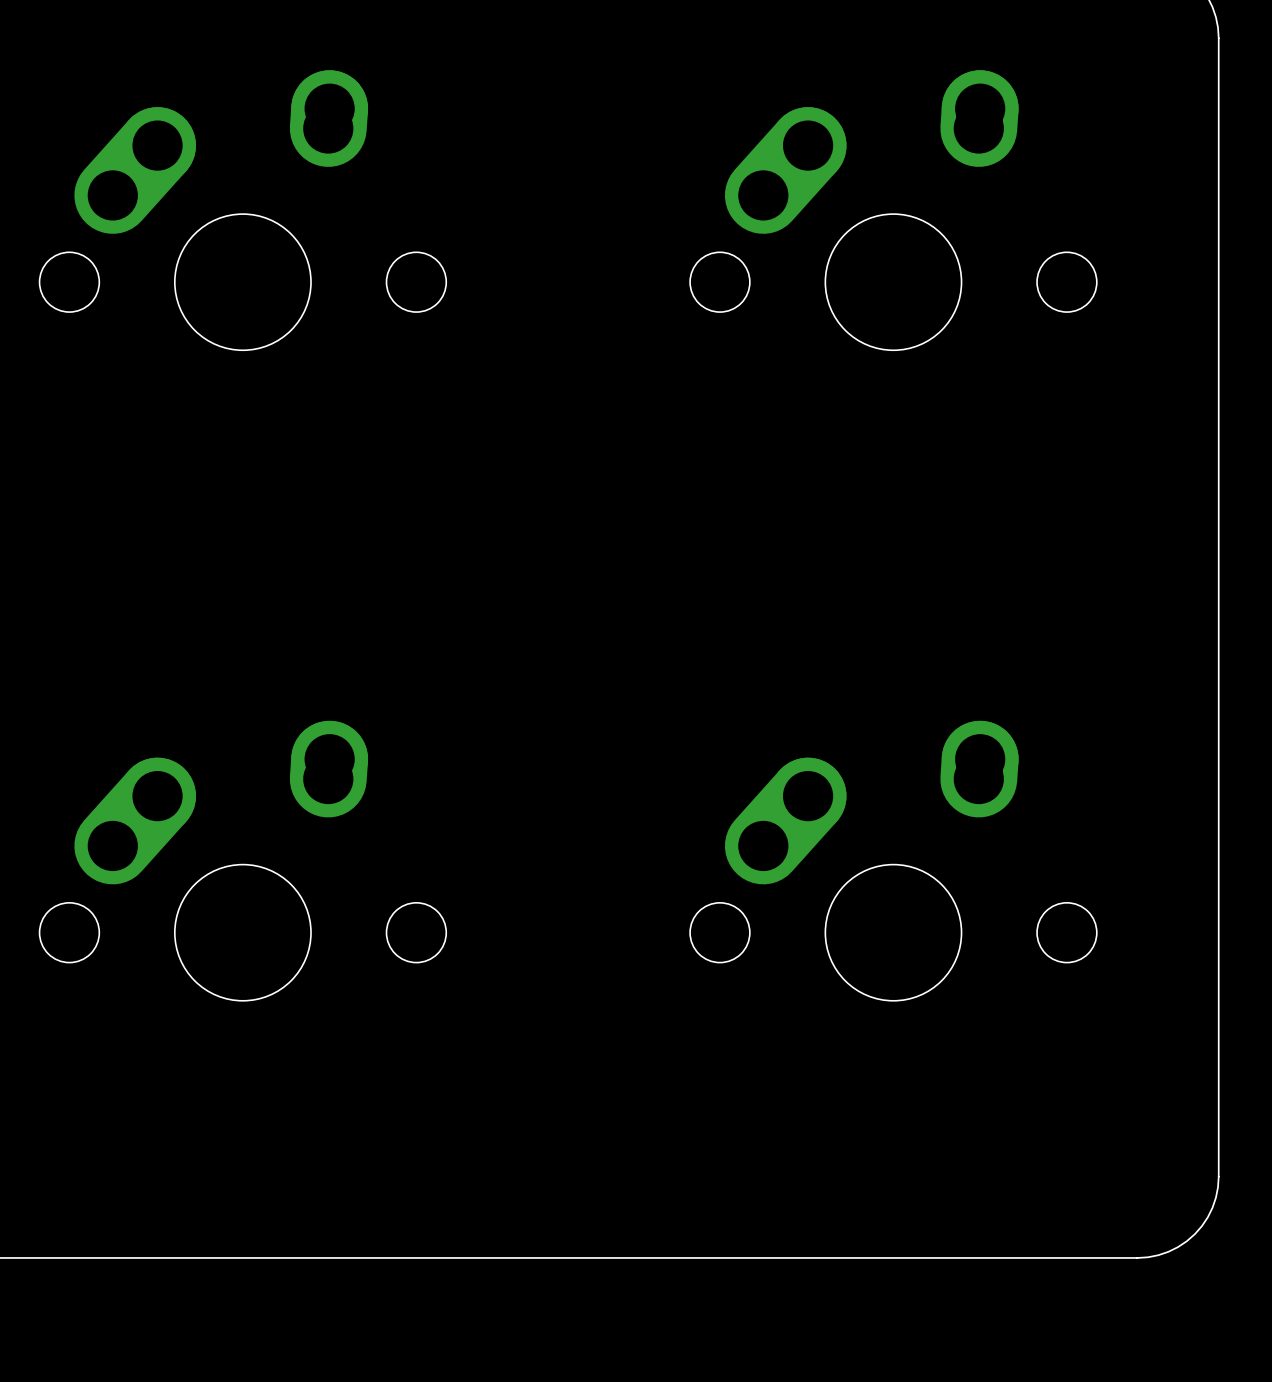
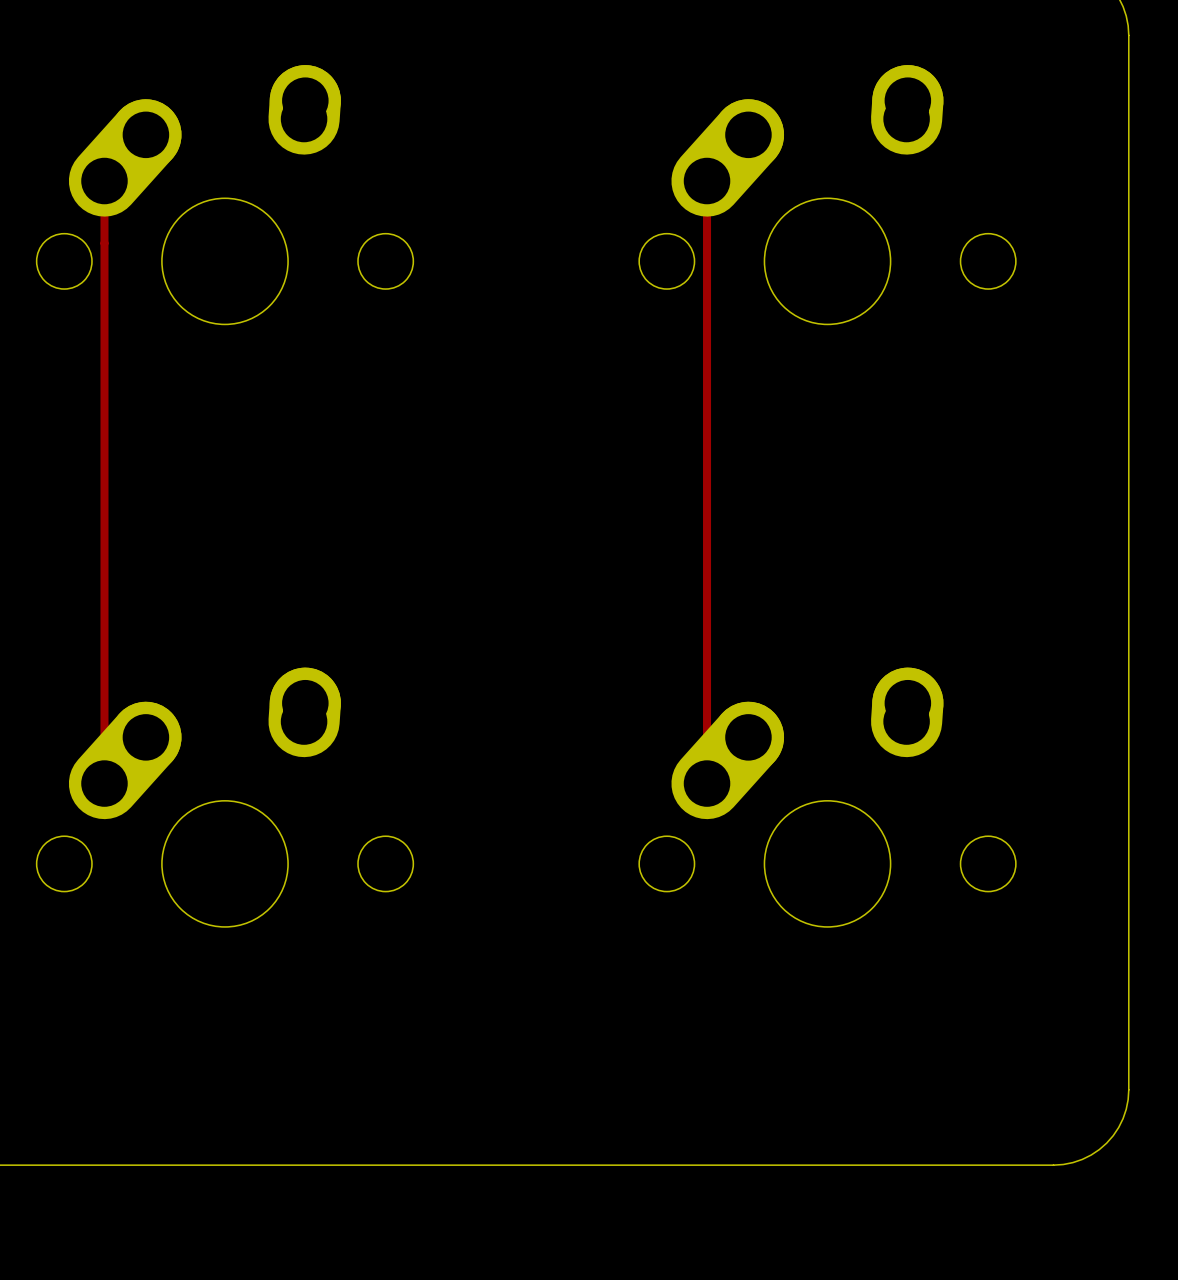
track: none -> (104, 181) (104, 783)
track: none -> (707, 181) (707, 783)

